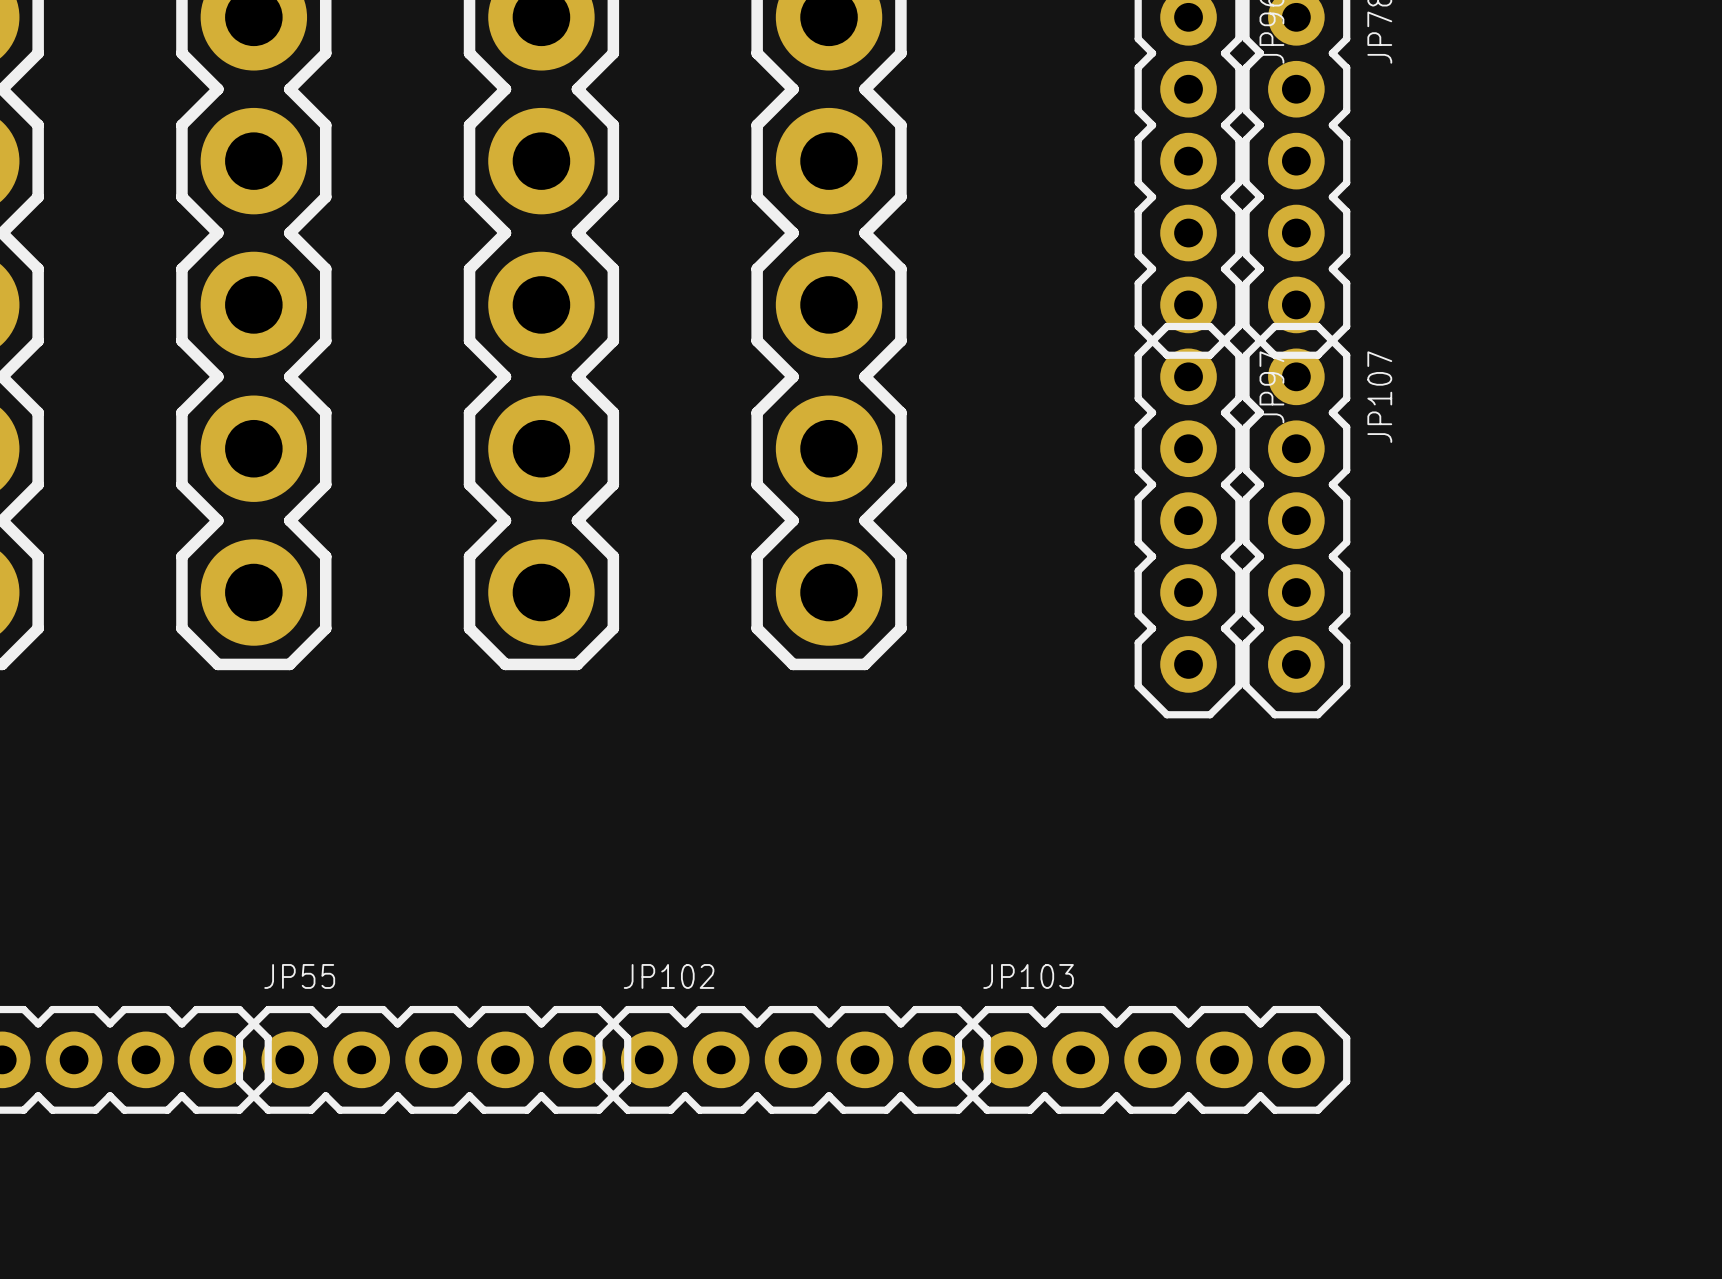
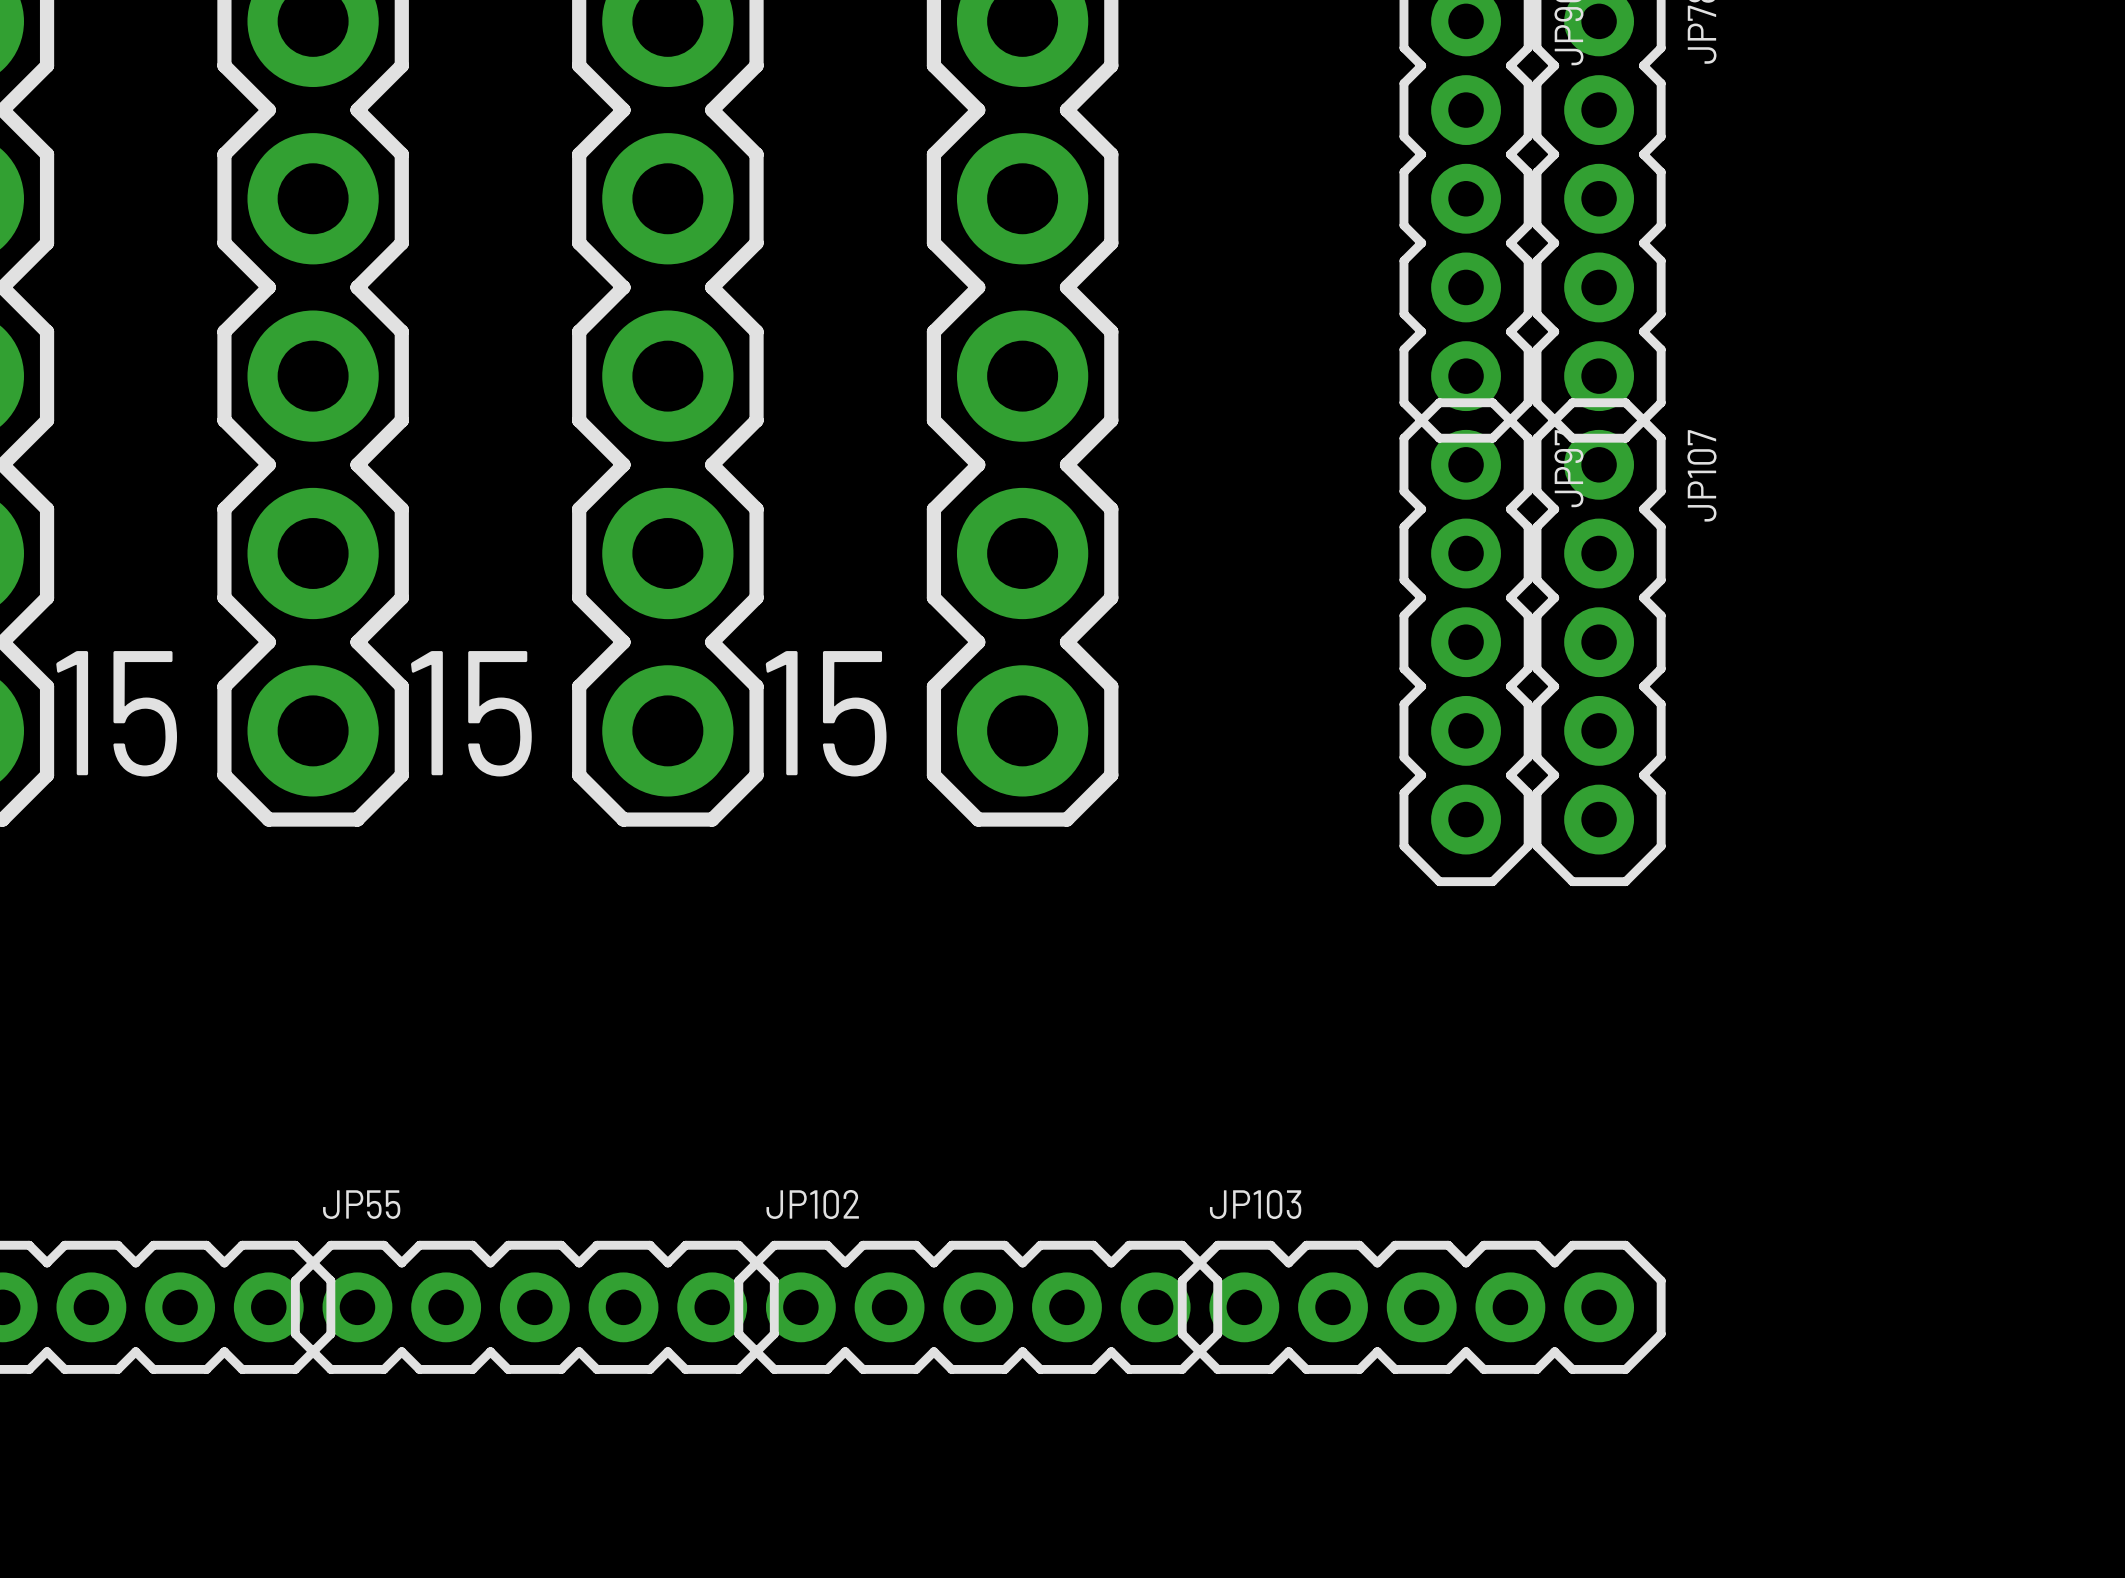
text: none -> 15 (116, 713)
text: none -> 15 (471, 713)
text: none -> 15 (826, 713)

